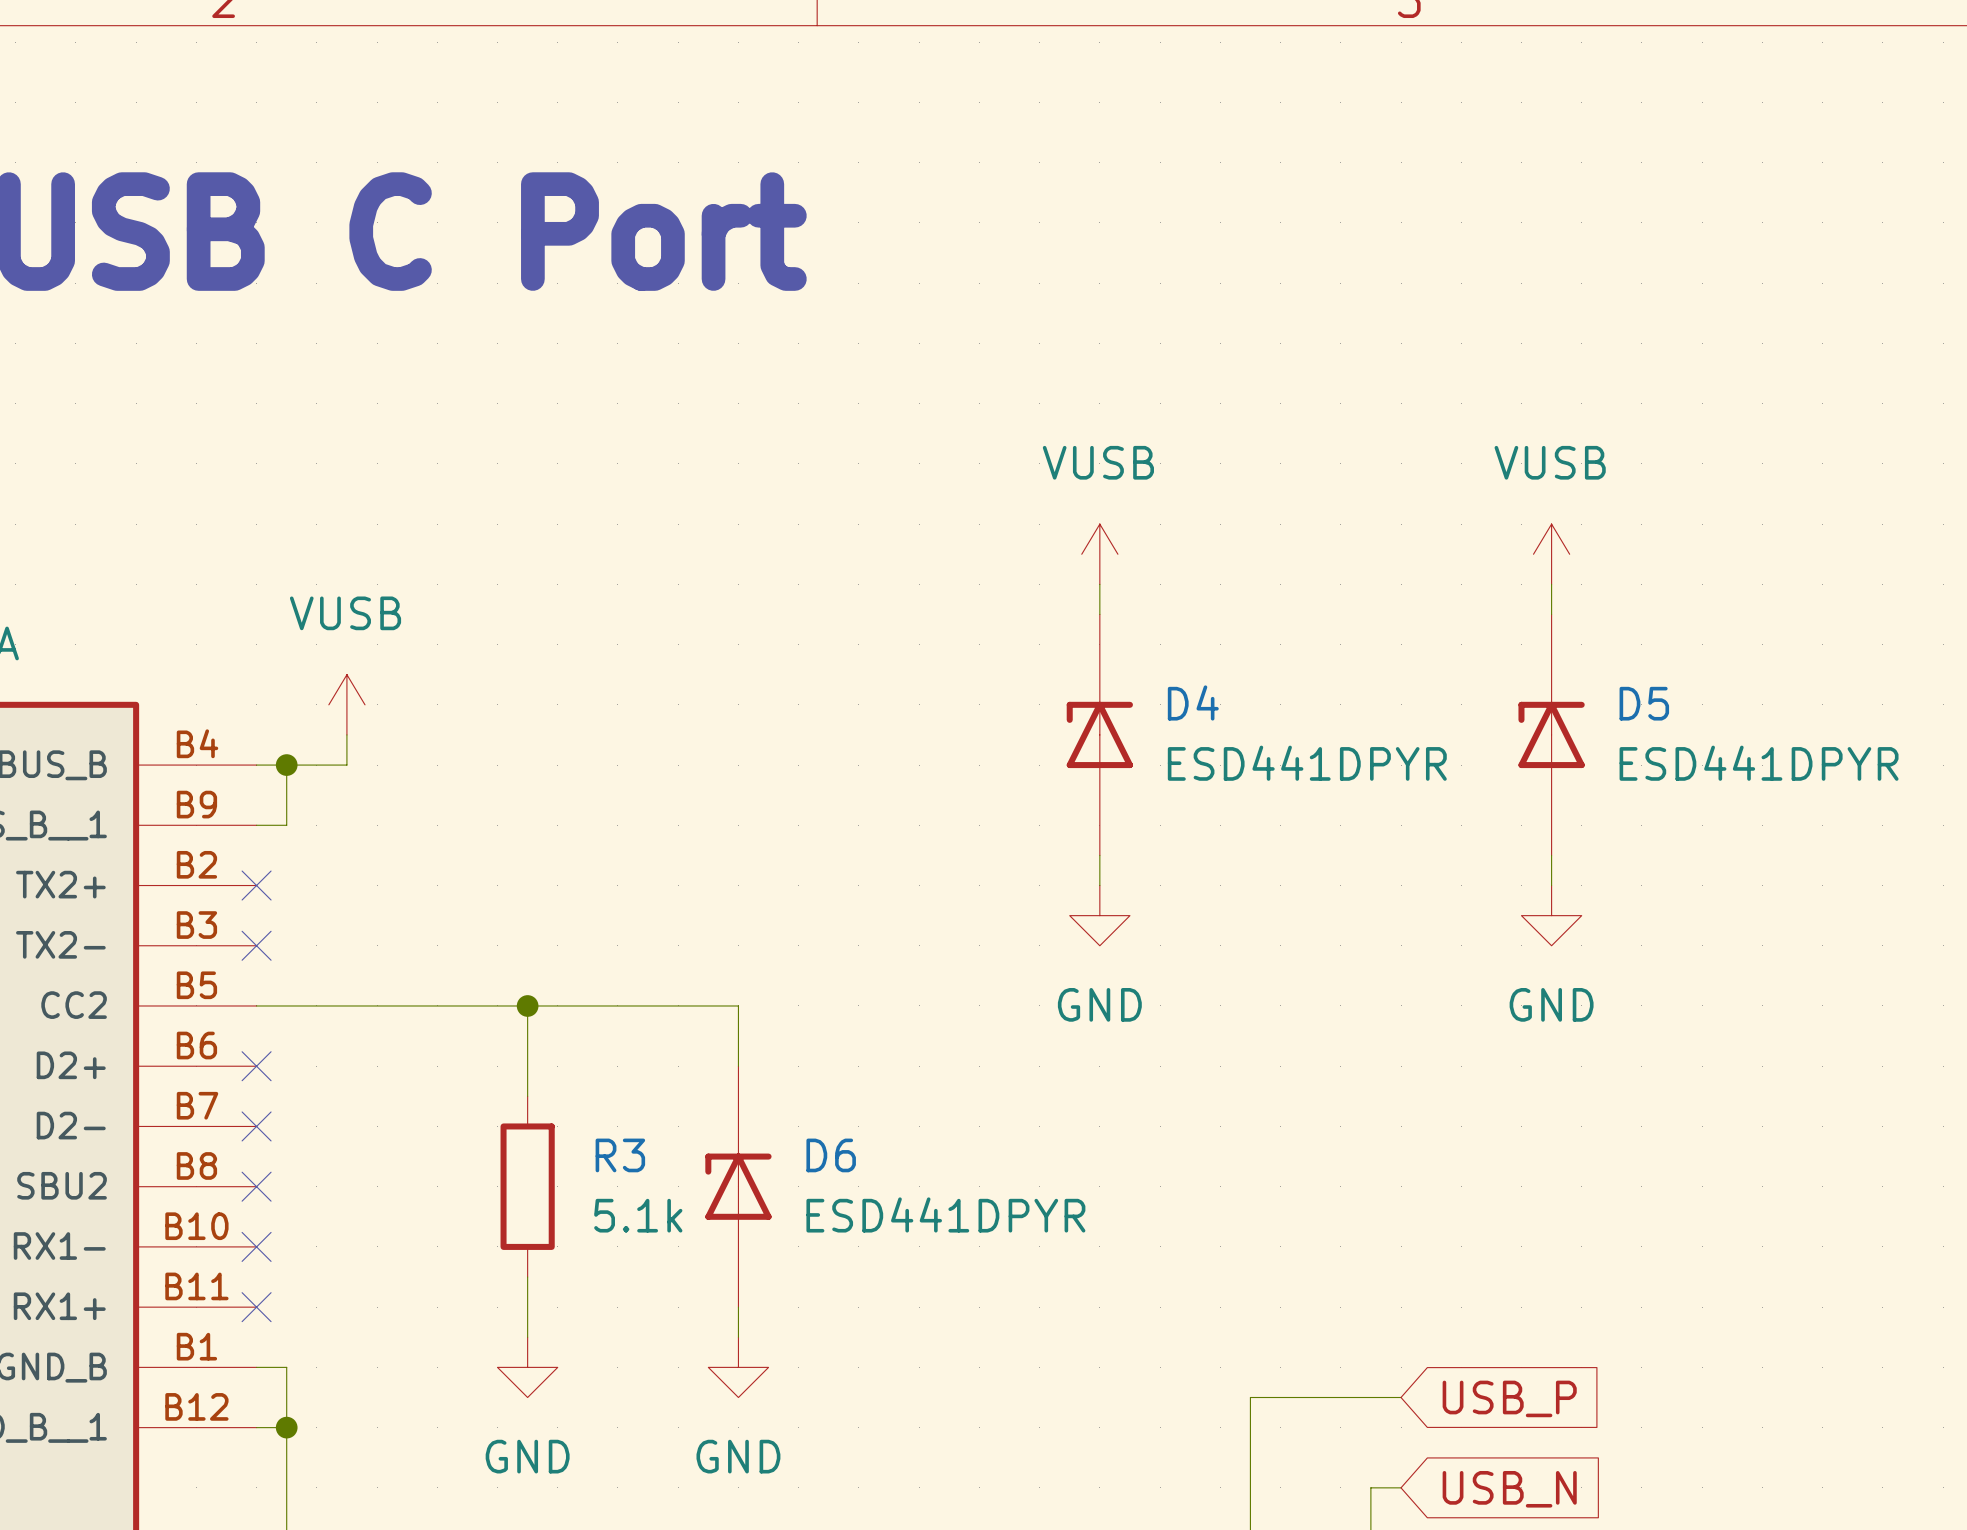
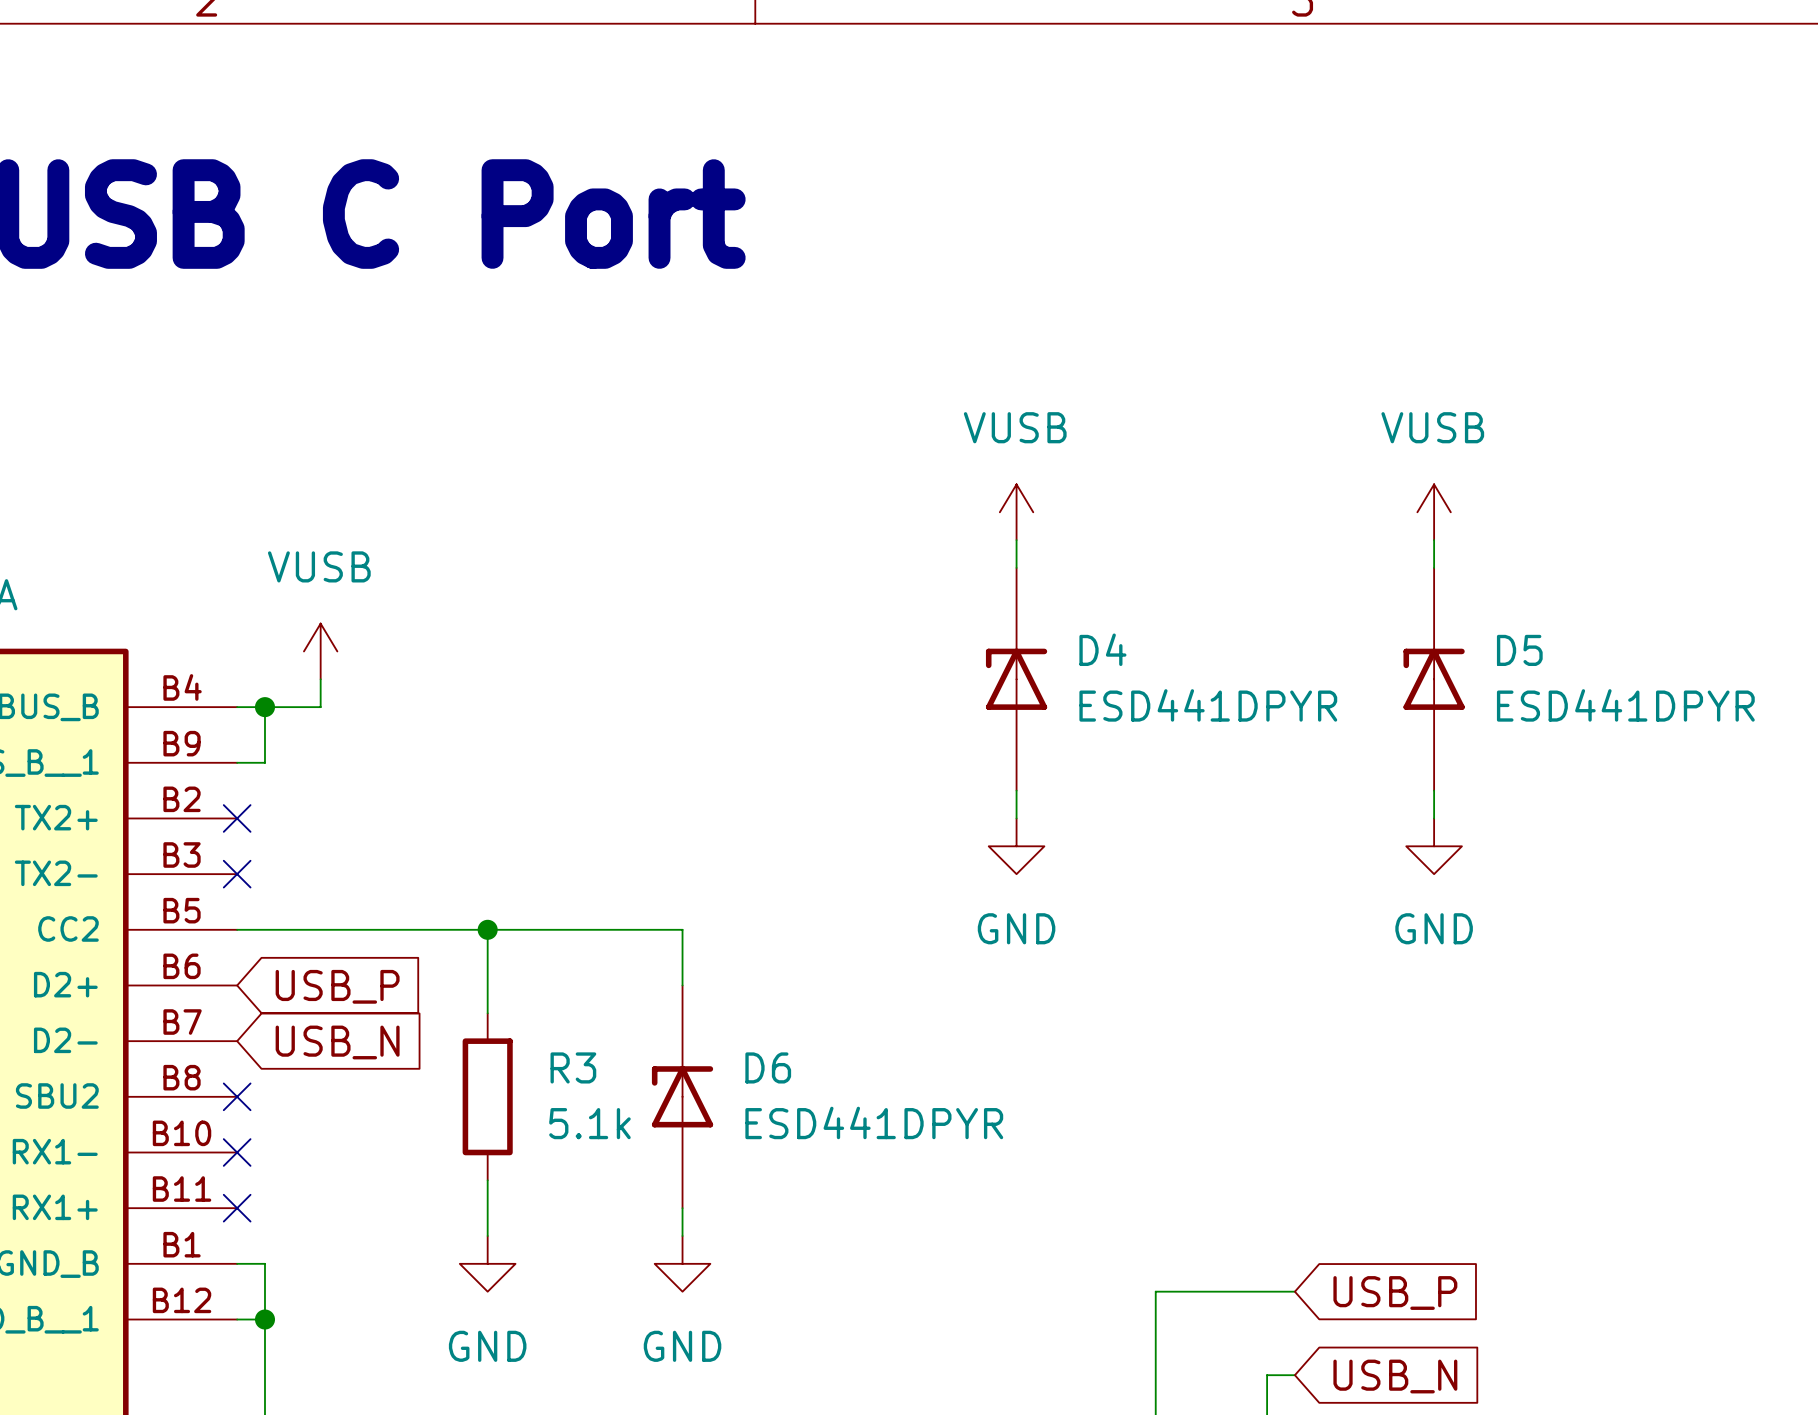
no-connect mark: (256, 1066) -> none
global label: none -> USB_P (337, 986)
no-connect mark: (256, 1126) -> none
global label: none -> USB_N (337, 1042)

